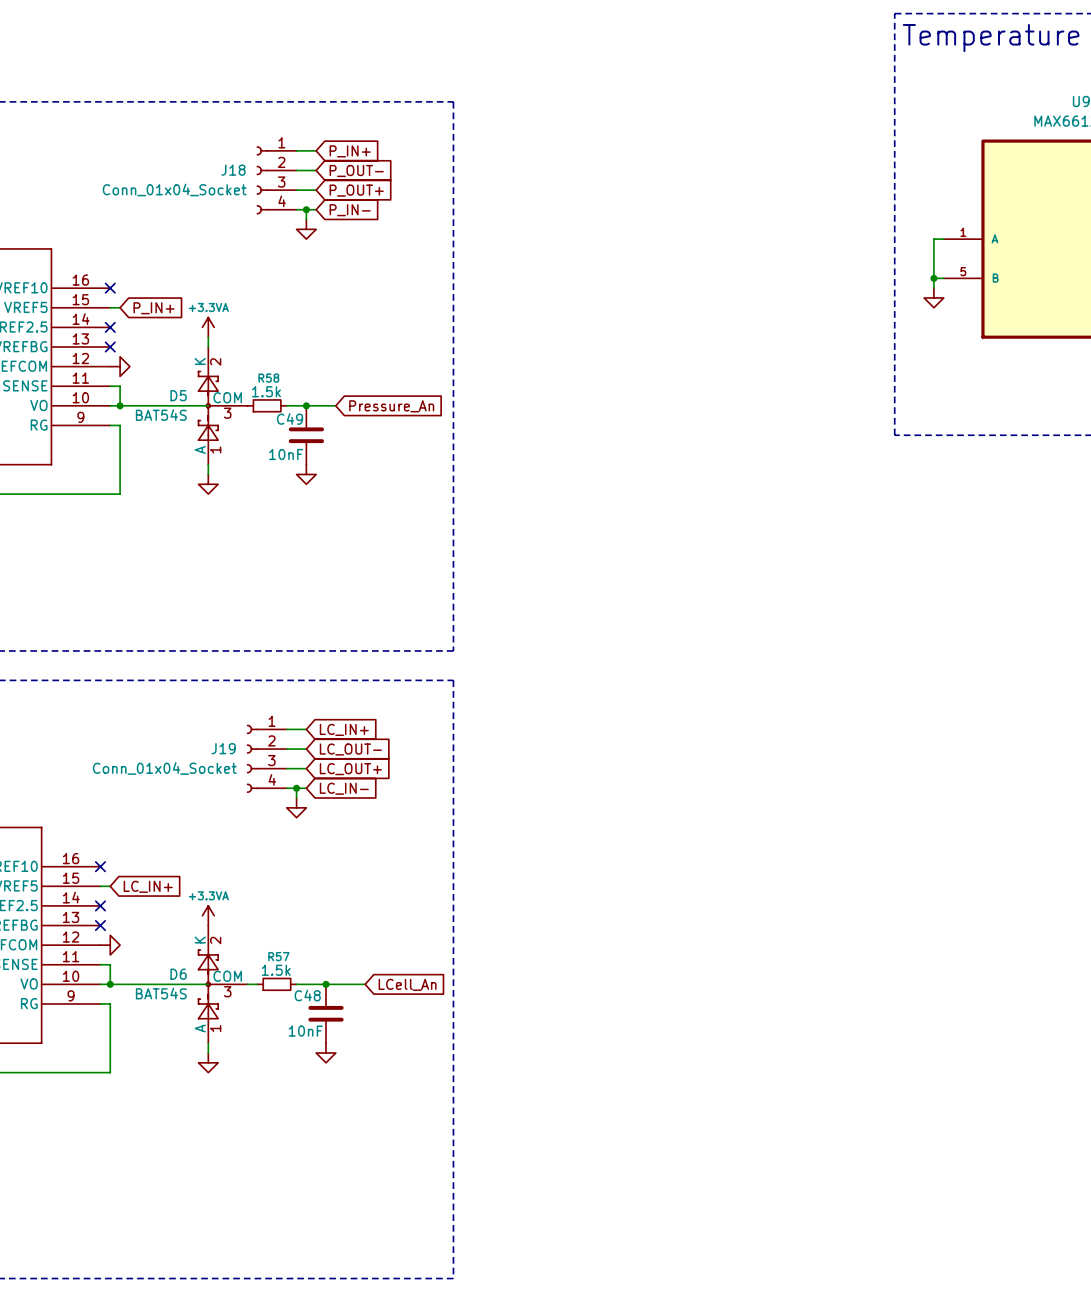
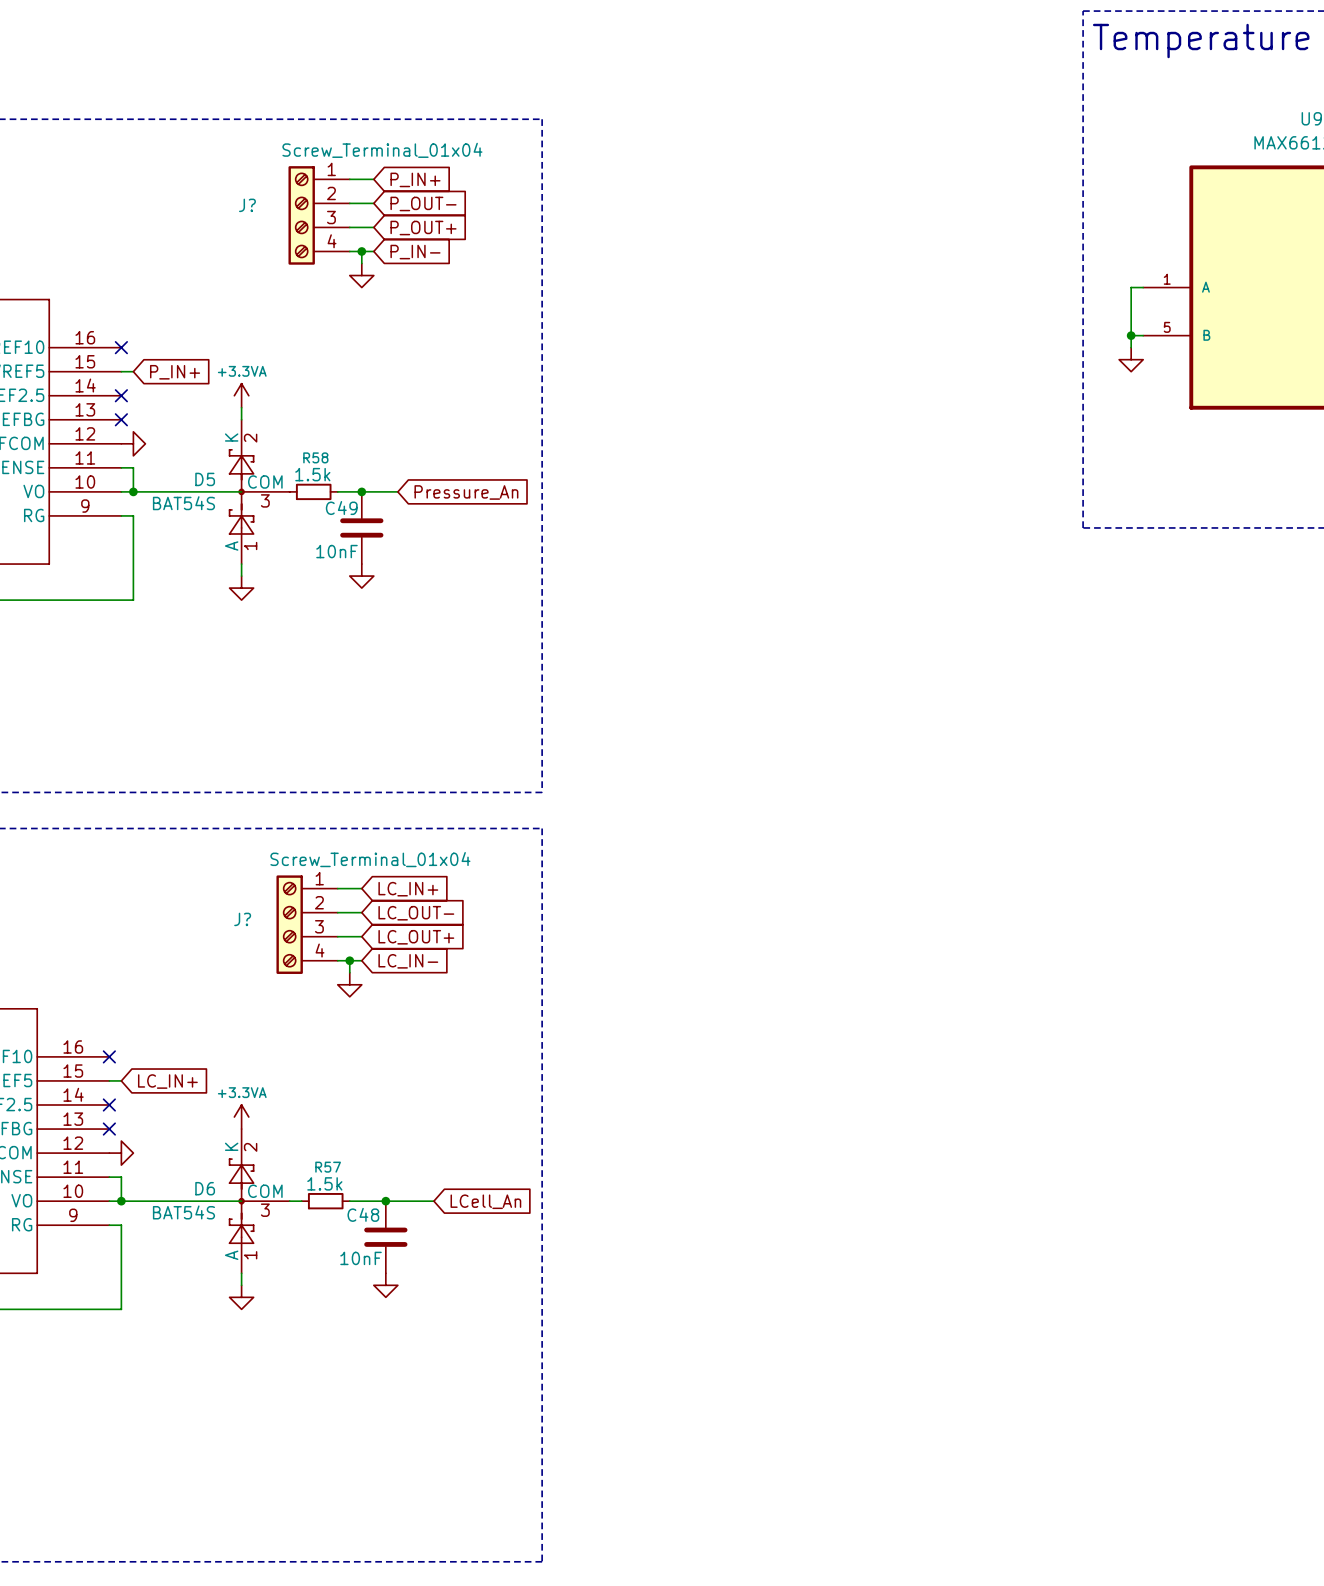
J?: none -> Screw_Terminal_01x04 (319, 215)
J18: Conn_01x04_Socket (276, 180) -> none
J?: none -> Screw_Terminal_01x04 (307, 924)
J19: Conn_01x04_Socket (266, 758) -> none

